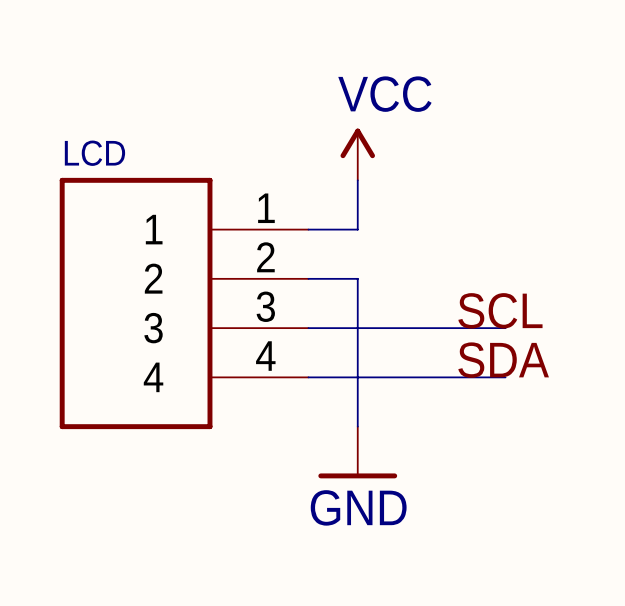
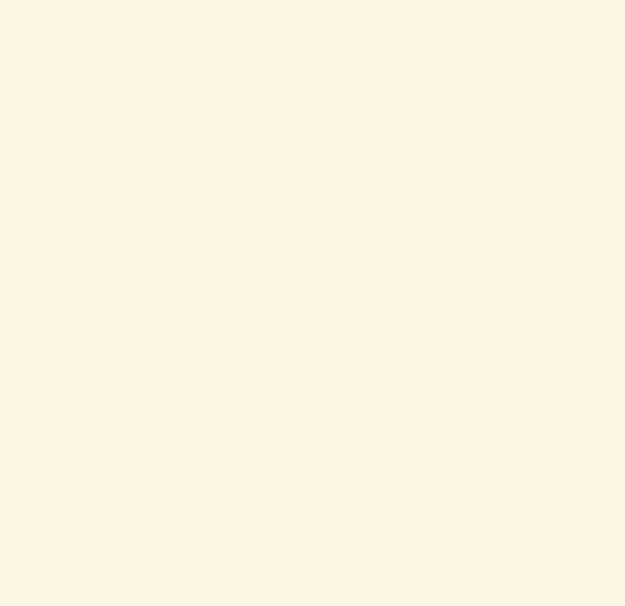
power symbol: VCC (357, 154) -> none
wire: (357, 180) (357, 229) (308, 229) -> none
wire: (308, 278) (357, 278) (357, 426) -> none
LCD: (184, 303) -> none
label: SCL (500, 310) -> none
wire: (308, 328) (505, 328) -> none
label: SDA (503, 360) -> none
wire: (308, 377) (505, 377) -> none
power symbol: GND (357, 452) -> none

